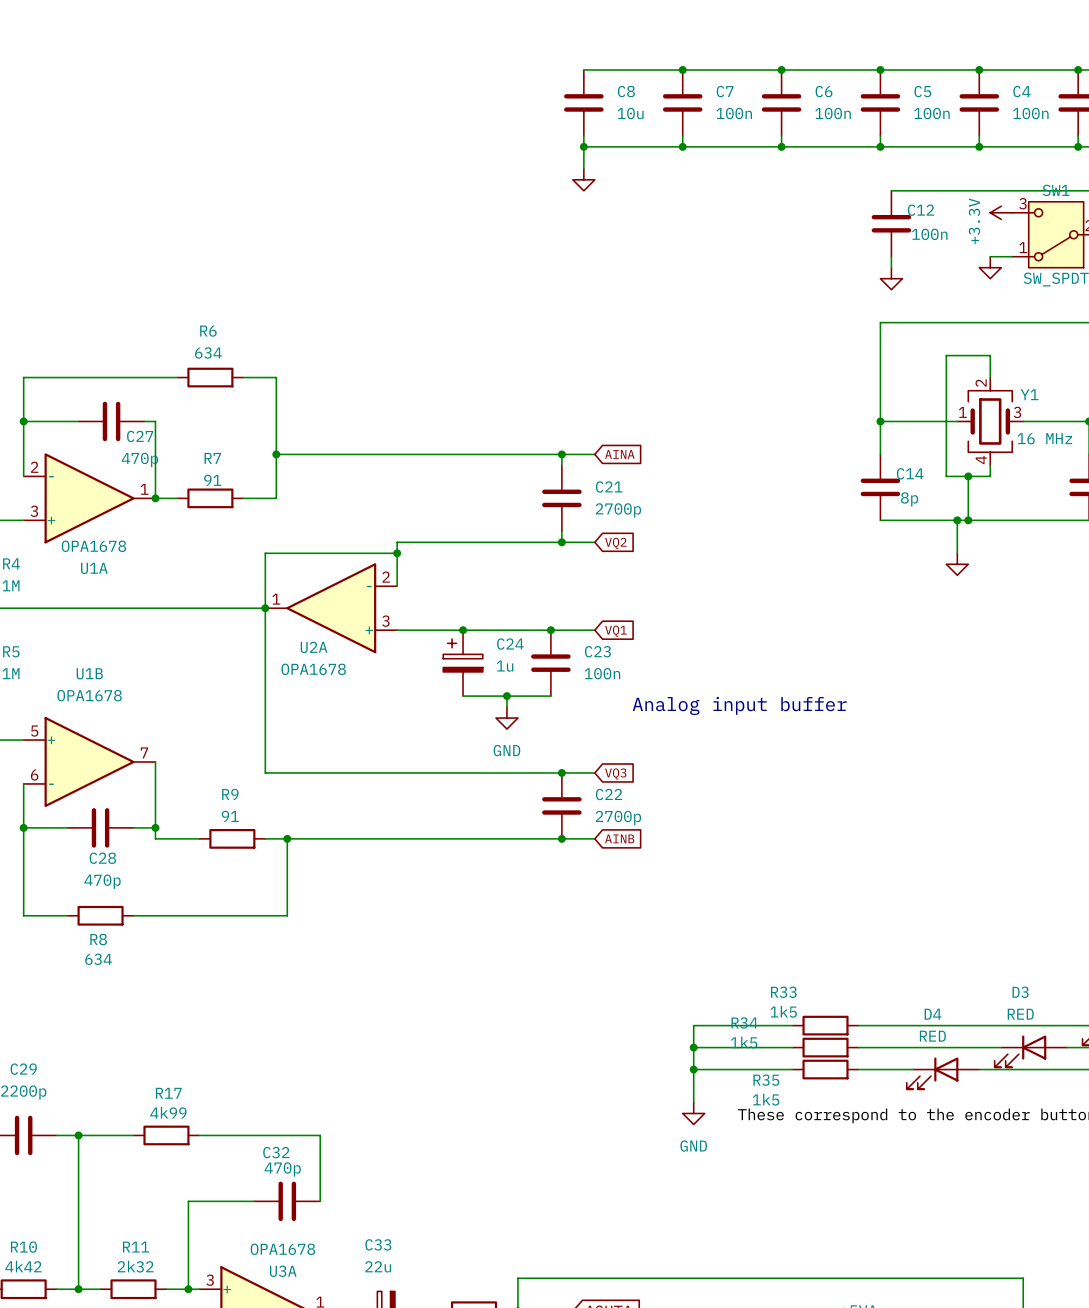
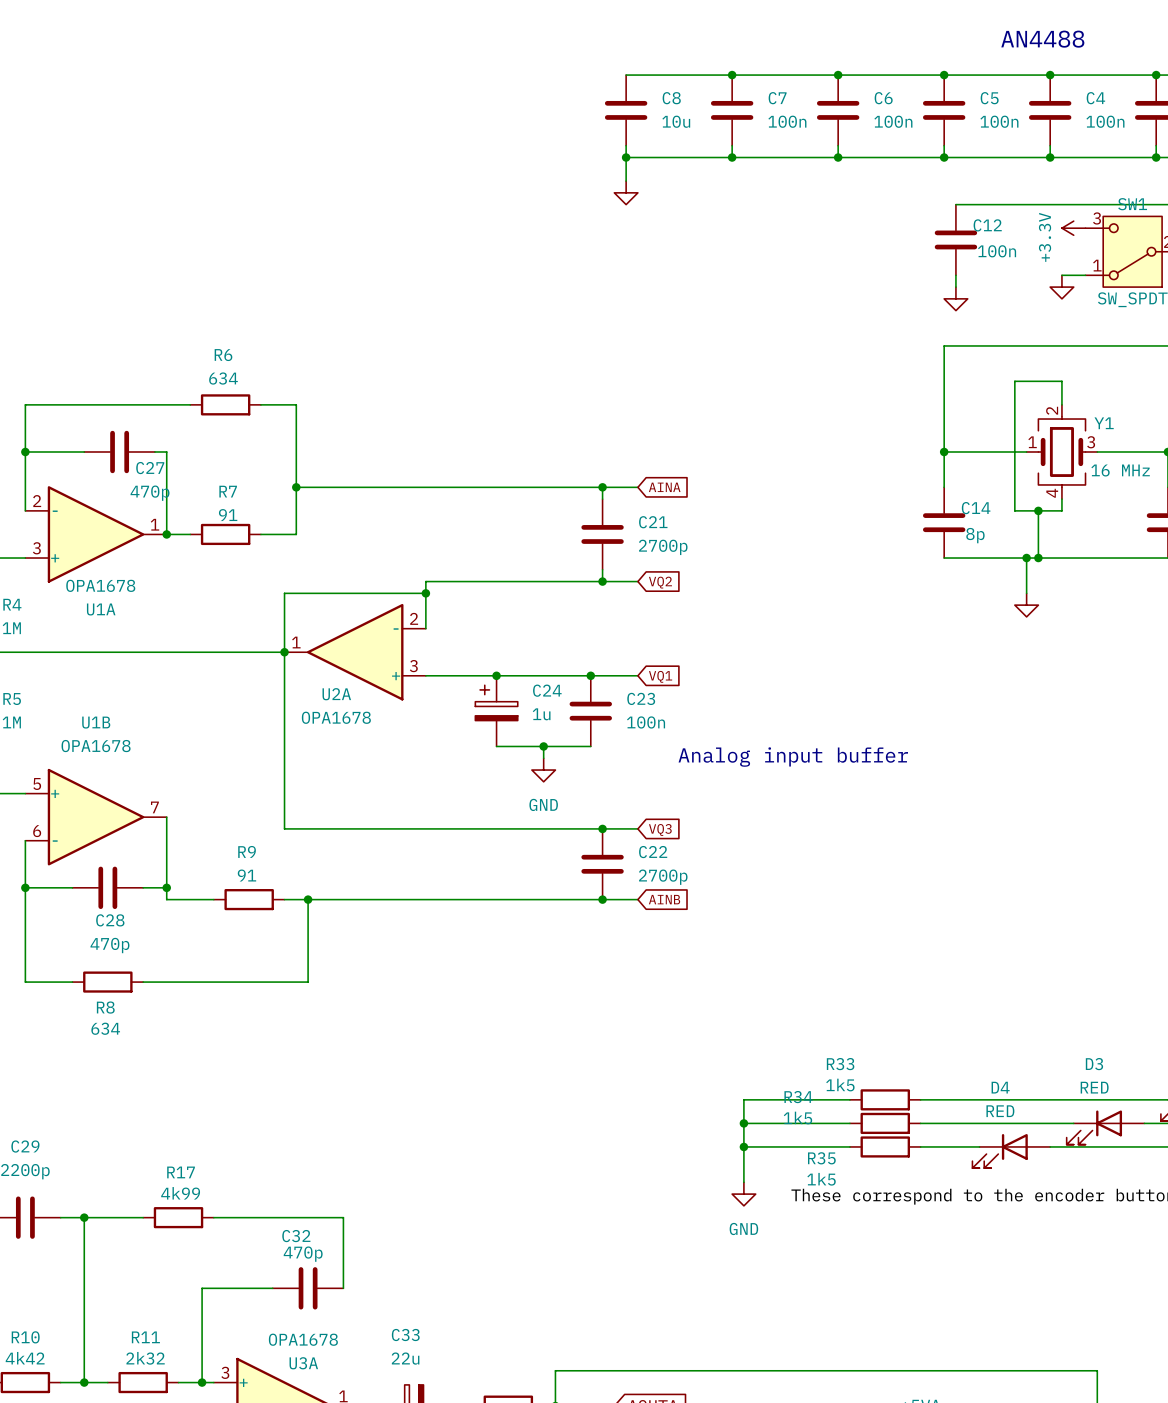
text: none -> AN4488 (1042, 39)

